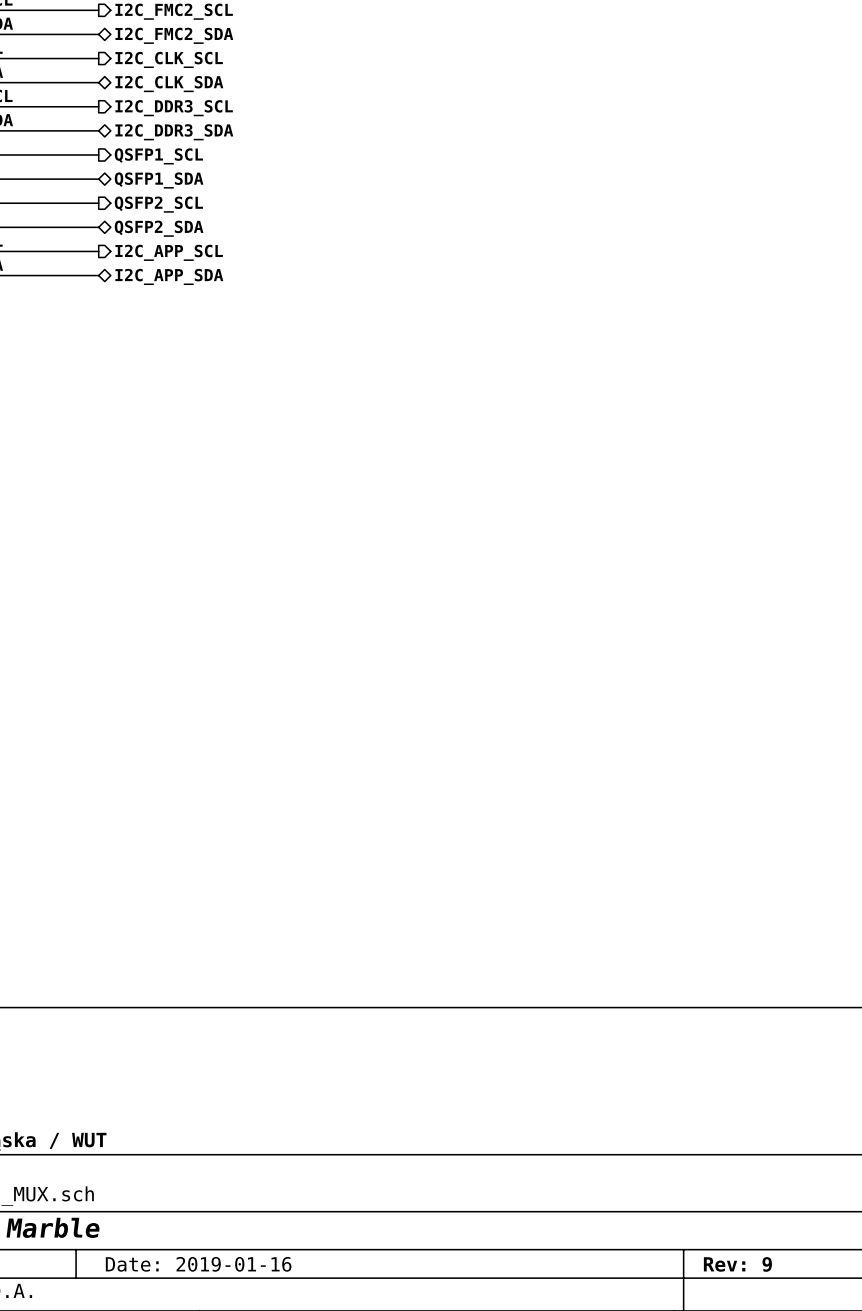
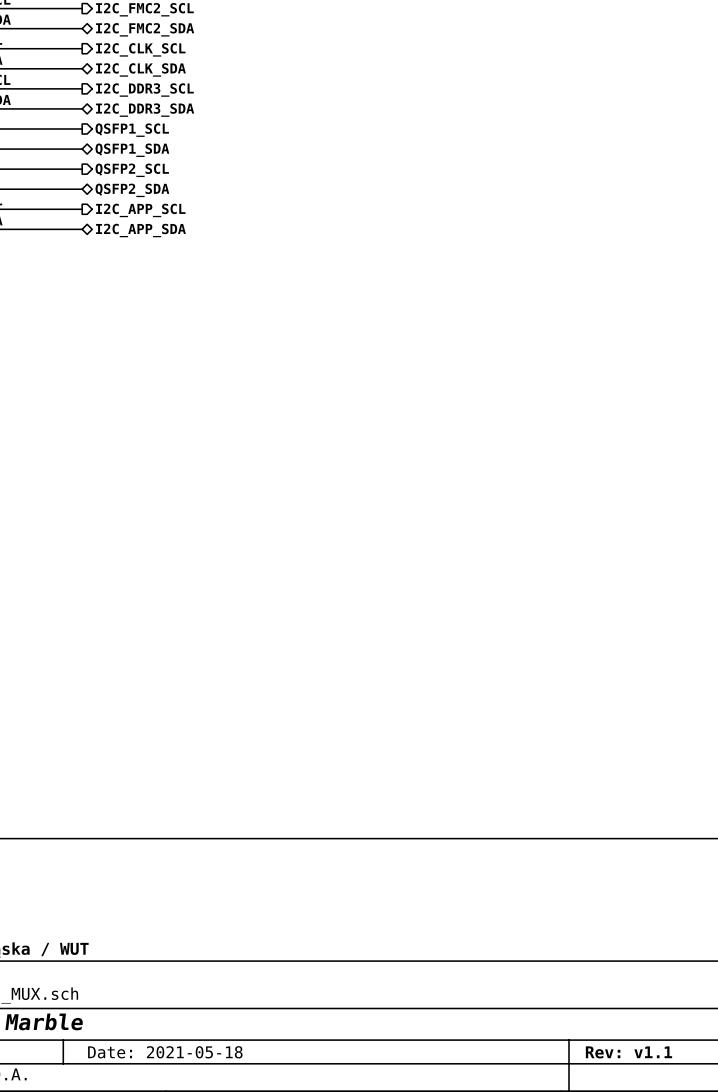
title block: Date: 2019-01-16 (198, 1264) -> Date: 2021-05-18 (165, 1052)
title block: Rev: 9 (737, 1264) -> Rev: v1.1 (628, 1052)

